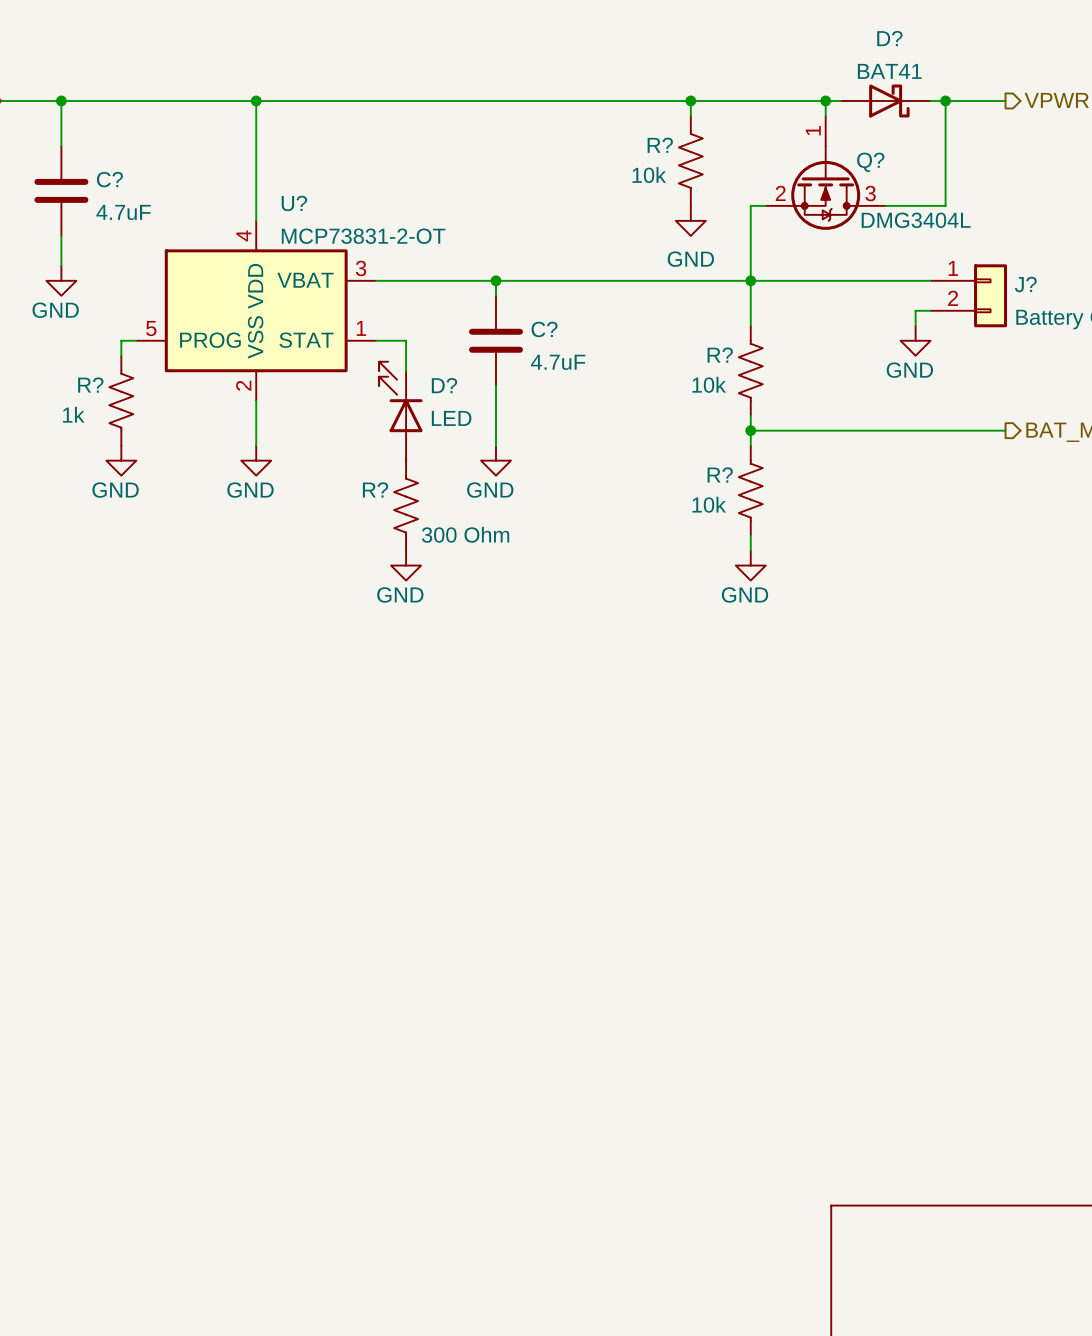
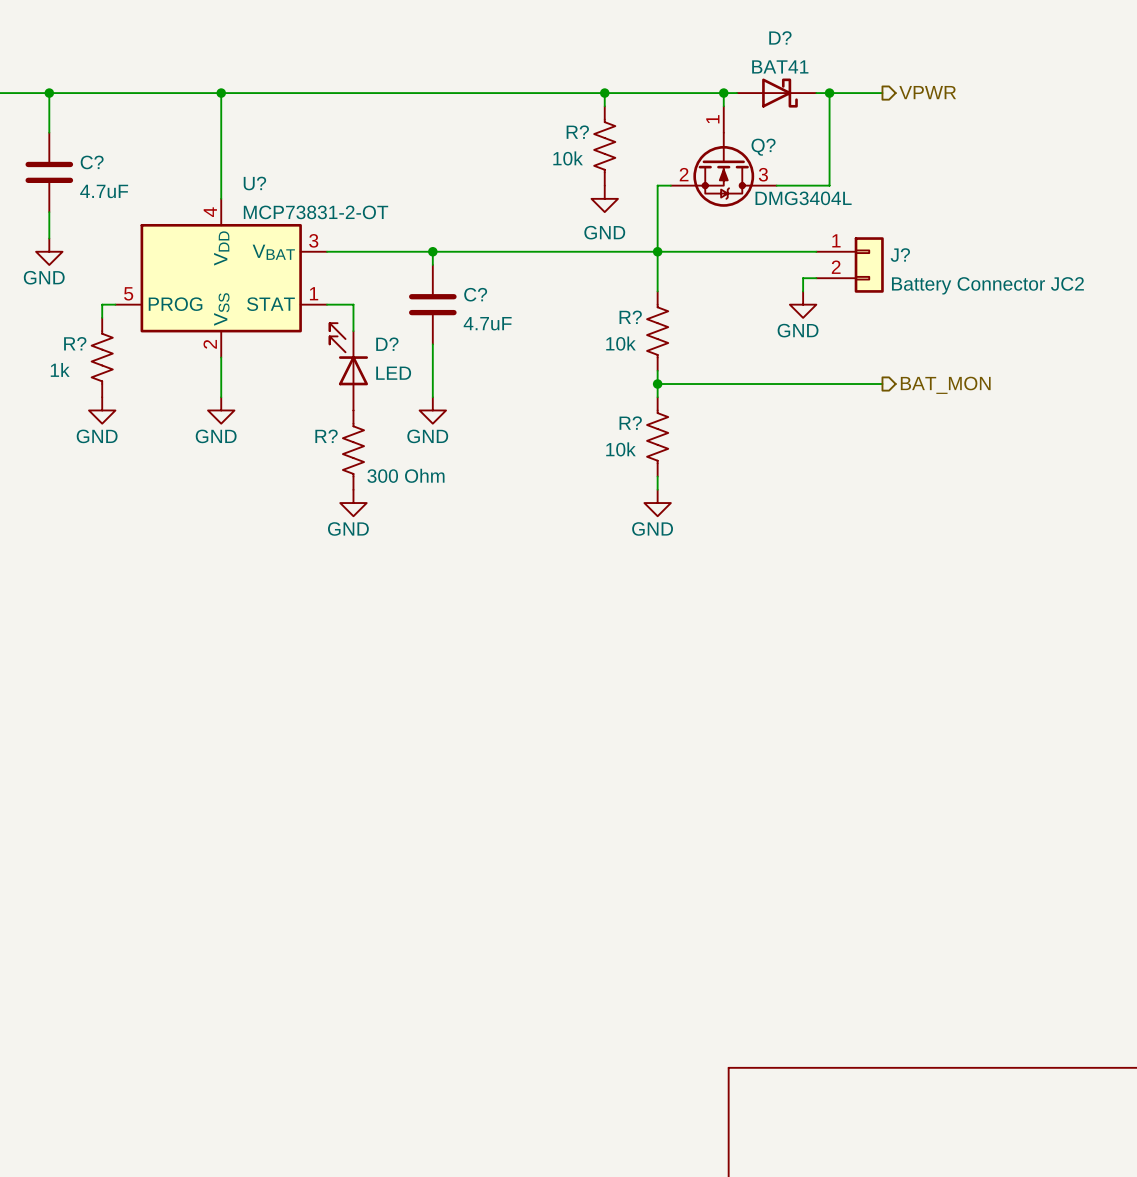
U? symbol: [136, 220, 377, 401] -> [115, 198, 328, 358]

